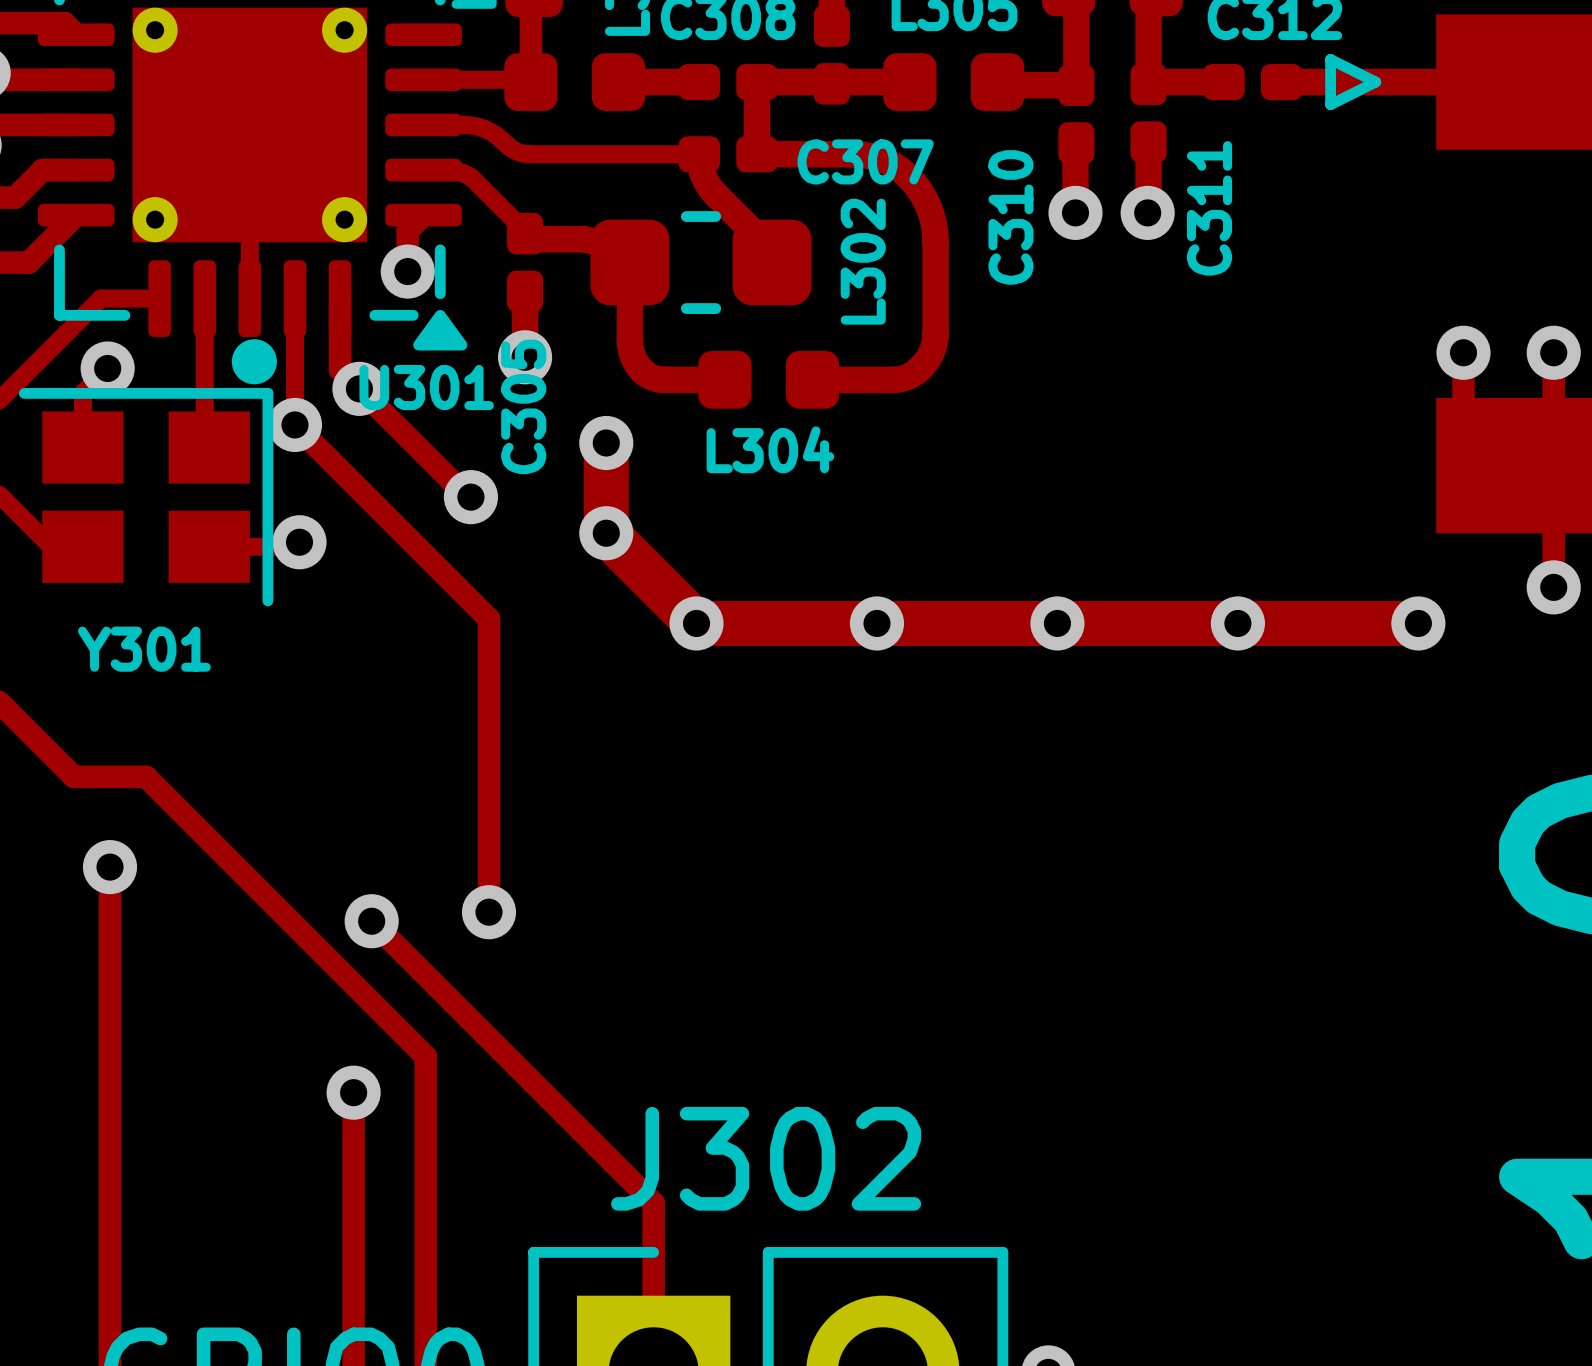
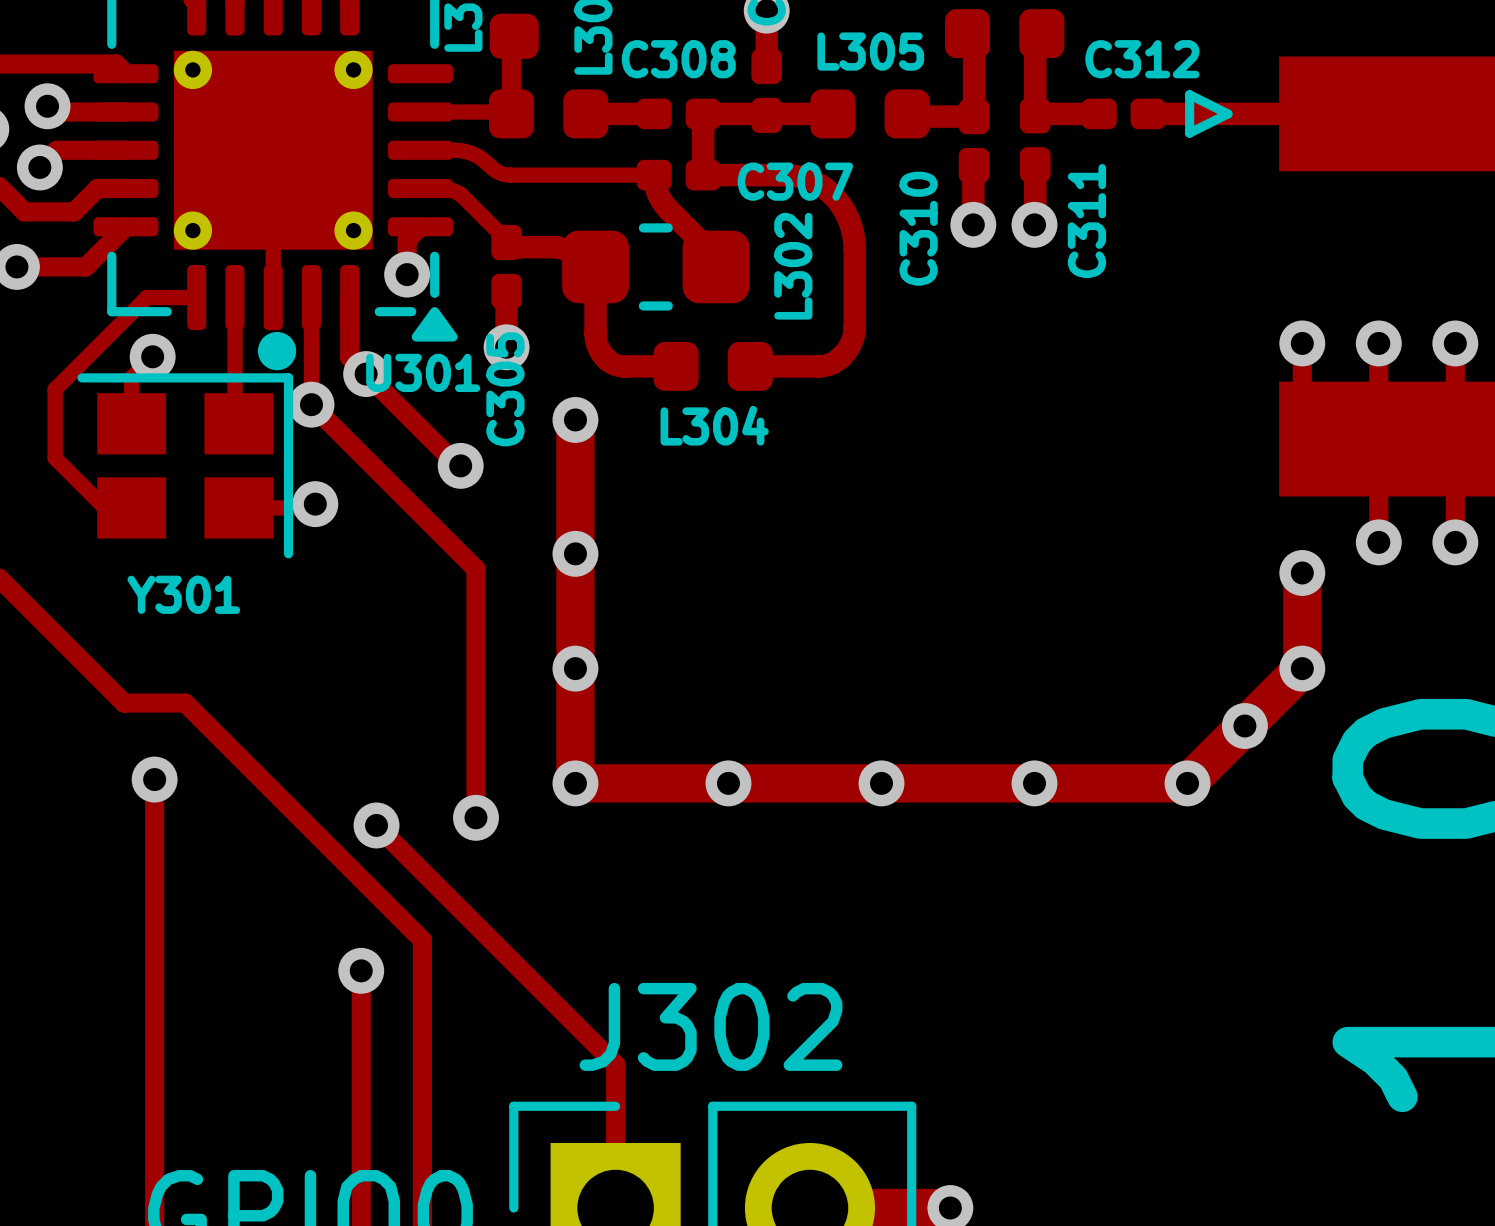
track: (606, 533) (696, 623) (1418, 623) -> (575, 496) (575, 783) (1187, 783) (1302, 668) (1302, 572)
via: (606, 533) -> none
via: none -> (575, 553)
via: (696, 623) -> none
via: (876, 623) -> none
via: (1057, 623) -> none
via: (1237, 623) -> none
via position: (1418, 623) -> (1302, 572)
via: none -> (575, 668)
via: none -> (1302, 668)
via: none -> (1244, 726)
via: none -> (575, 783)
via: none -> (728, 783)
via: none -> (881, 783)
via: none -> (1034, 783)
via: none -> (1187, 783)

